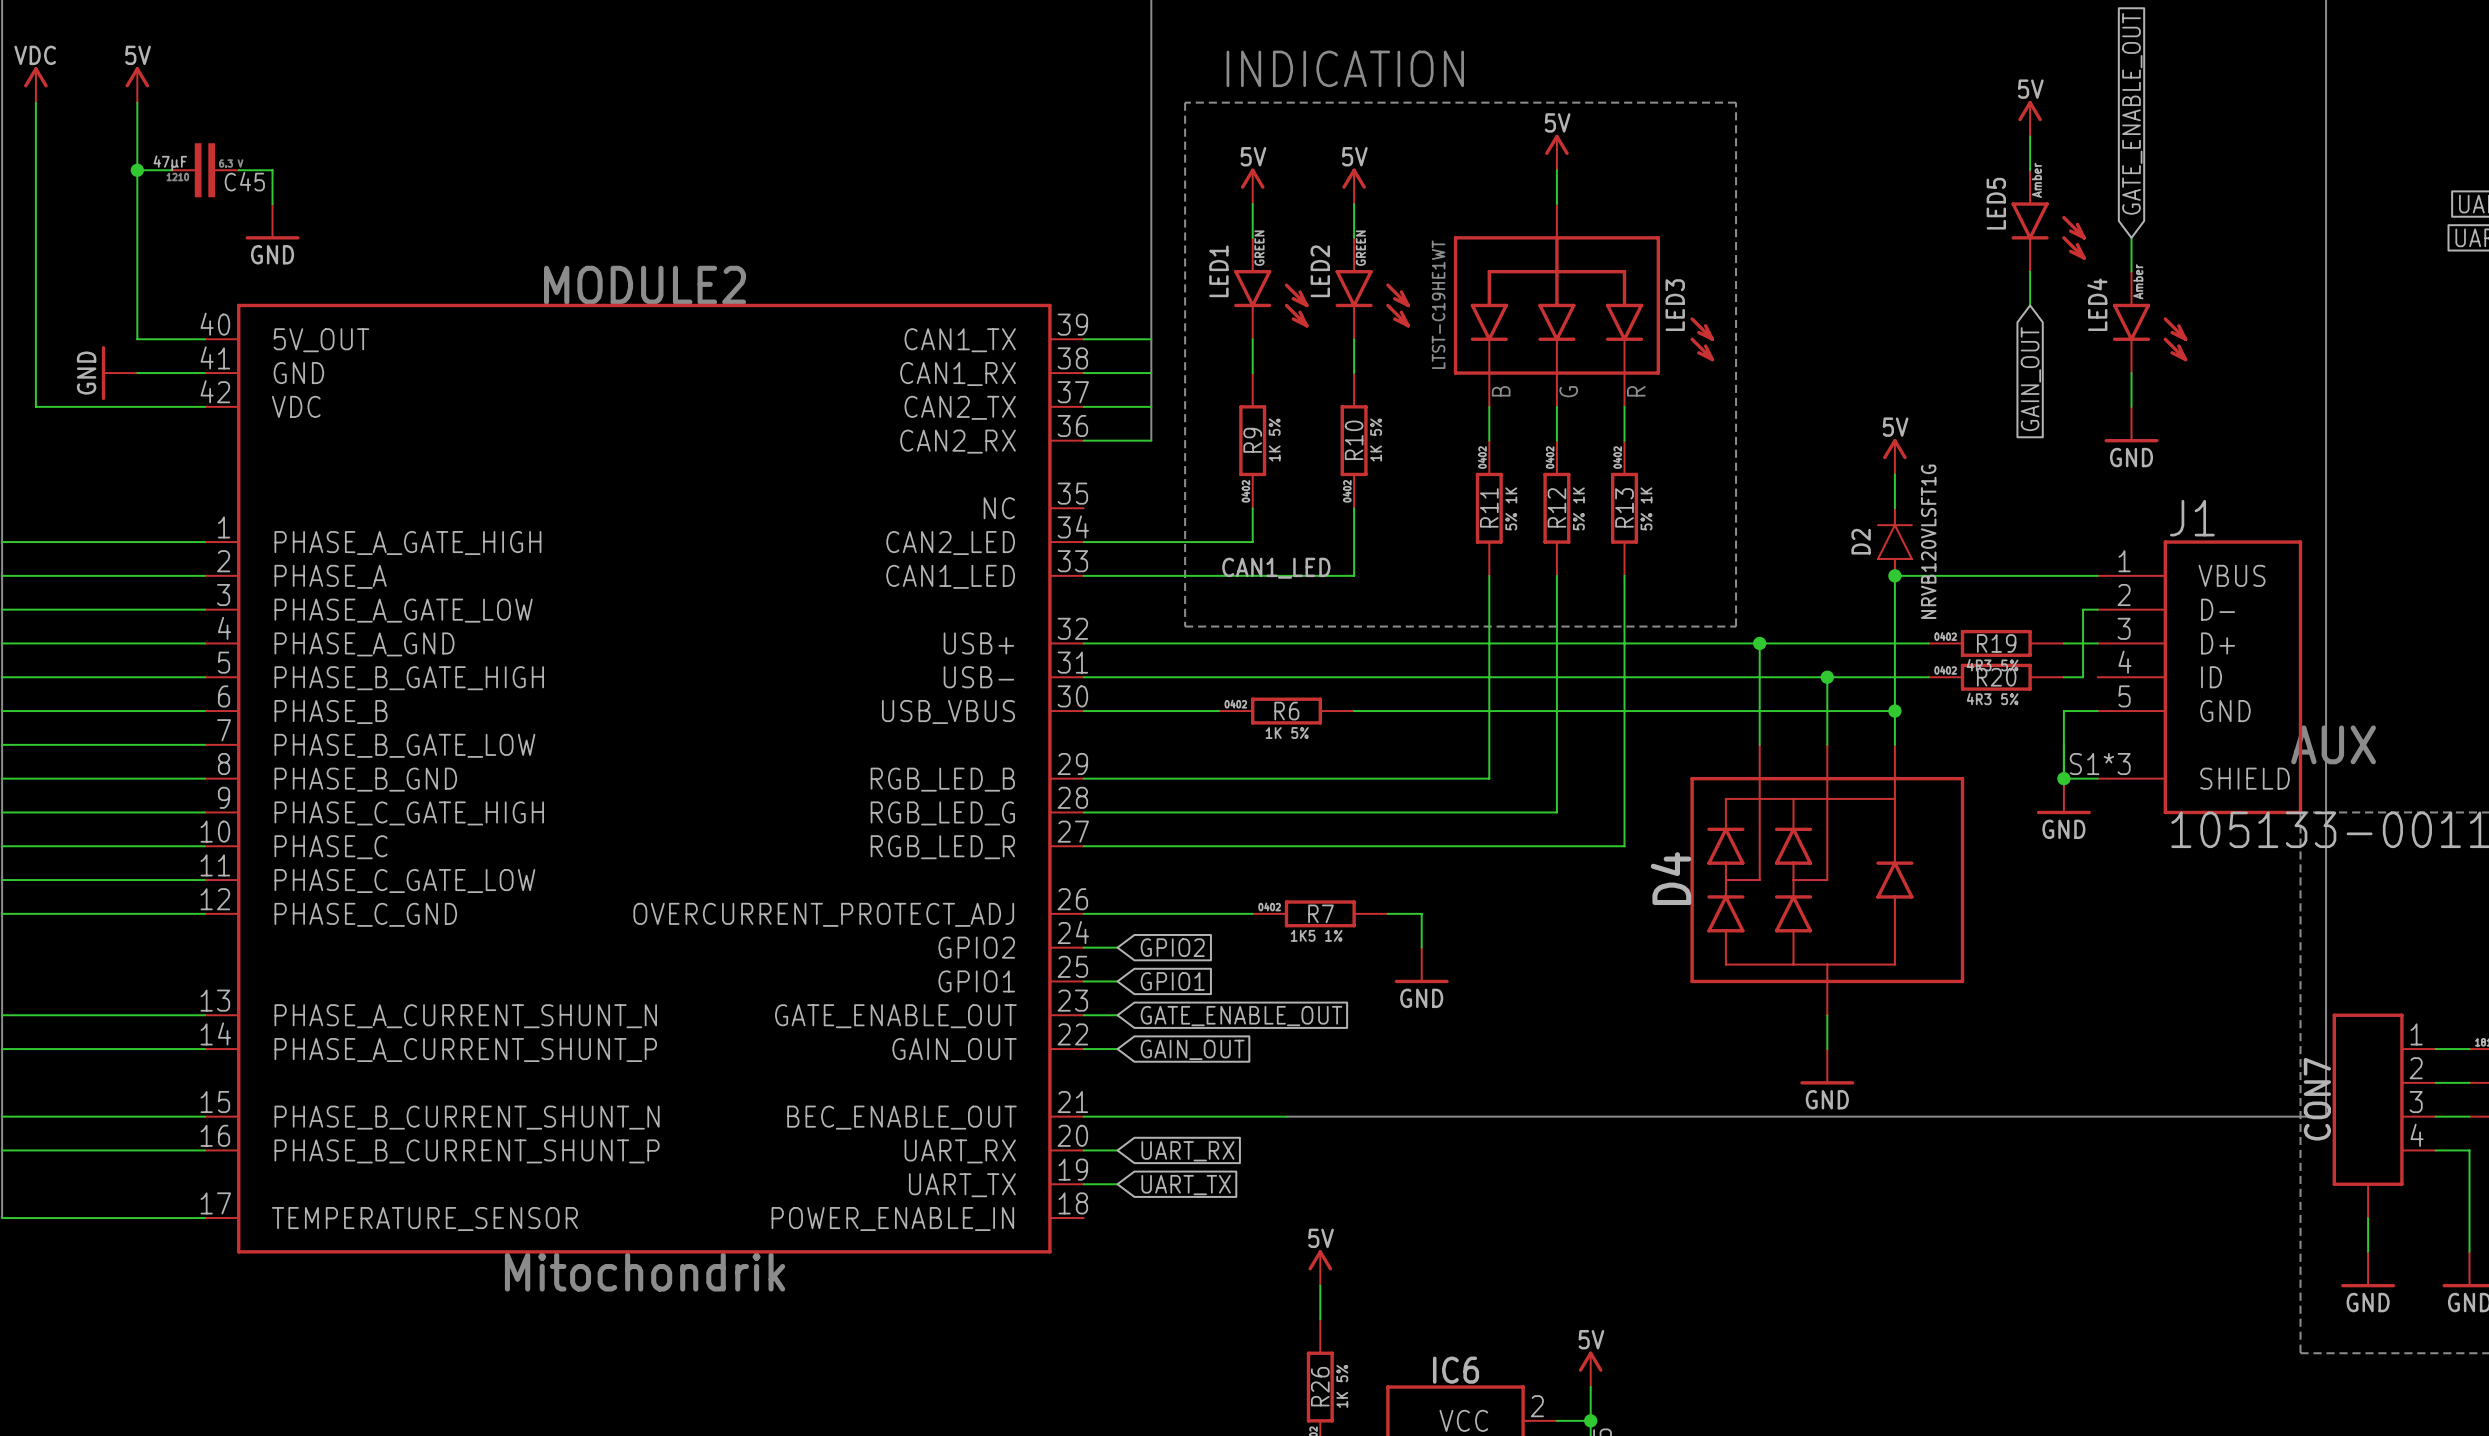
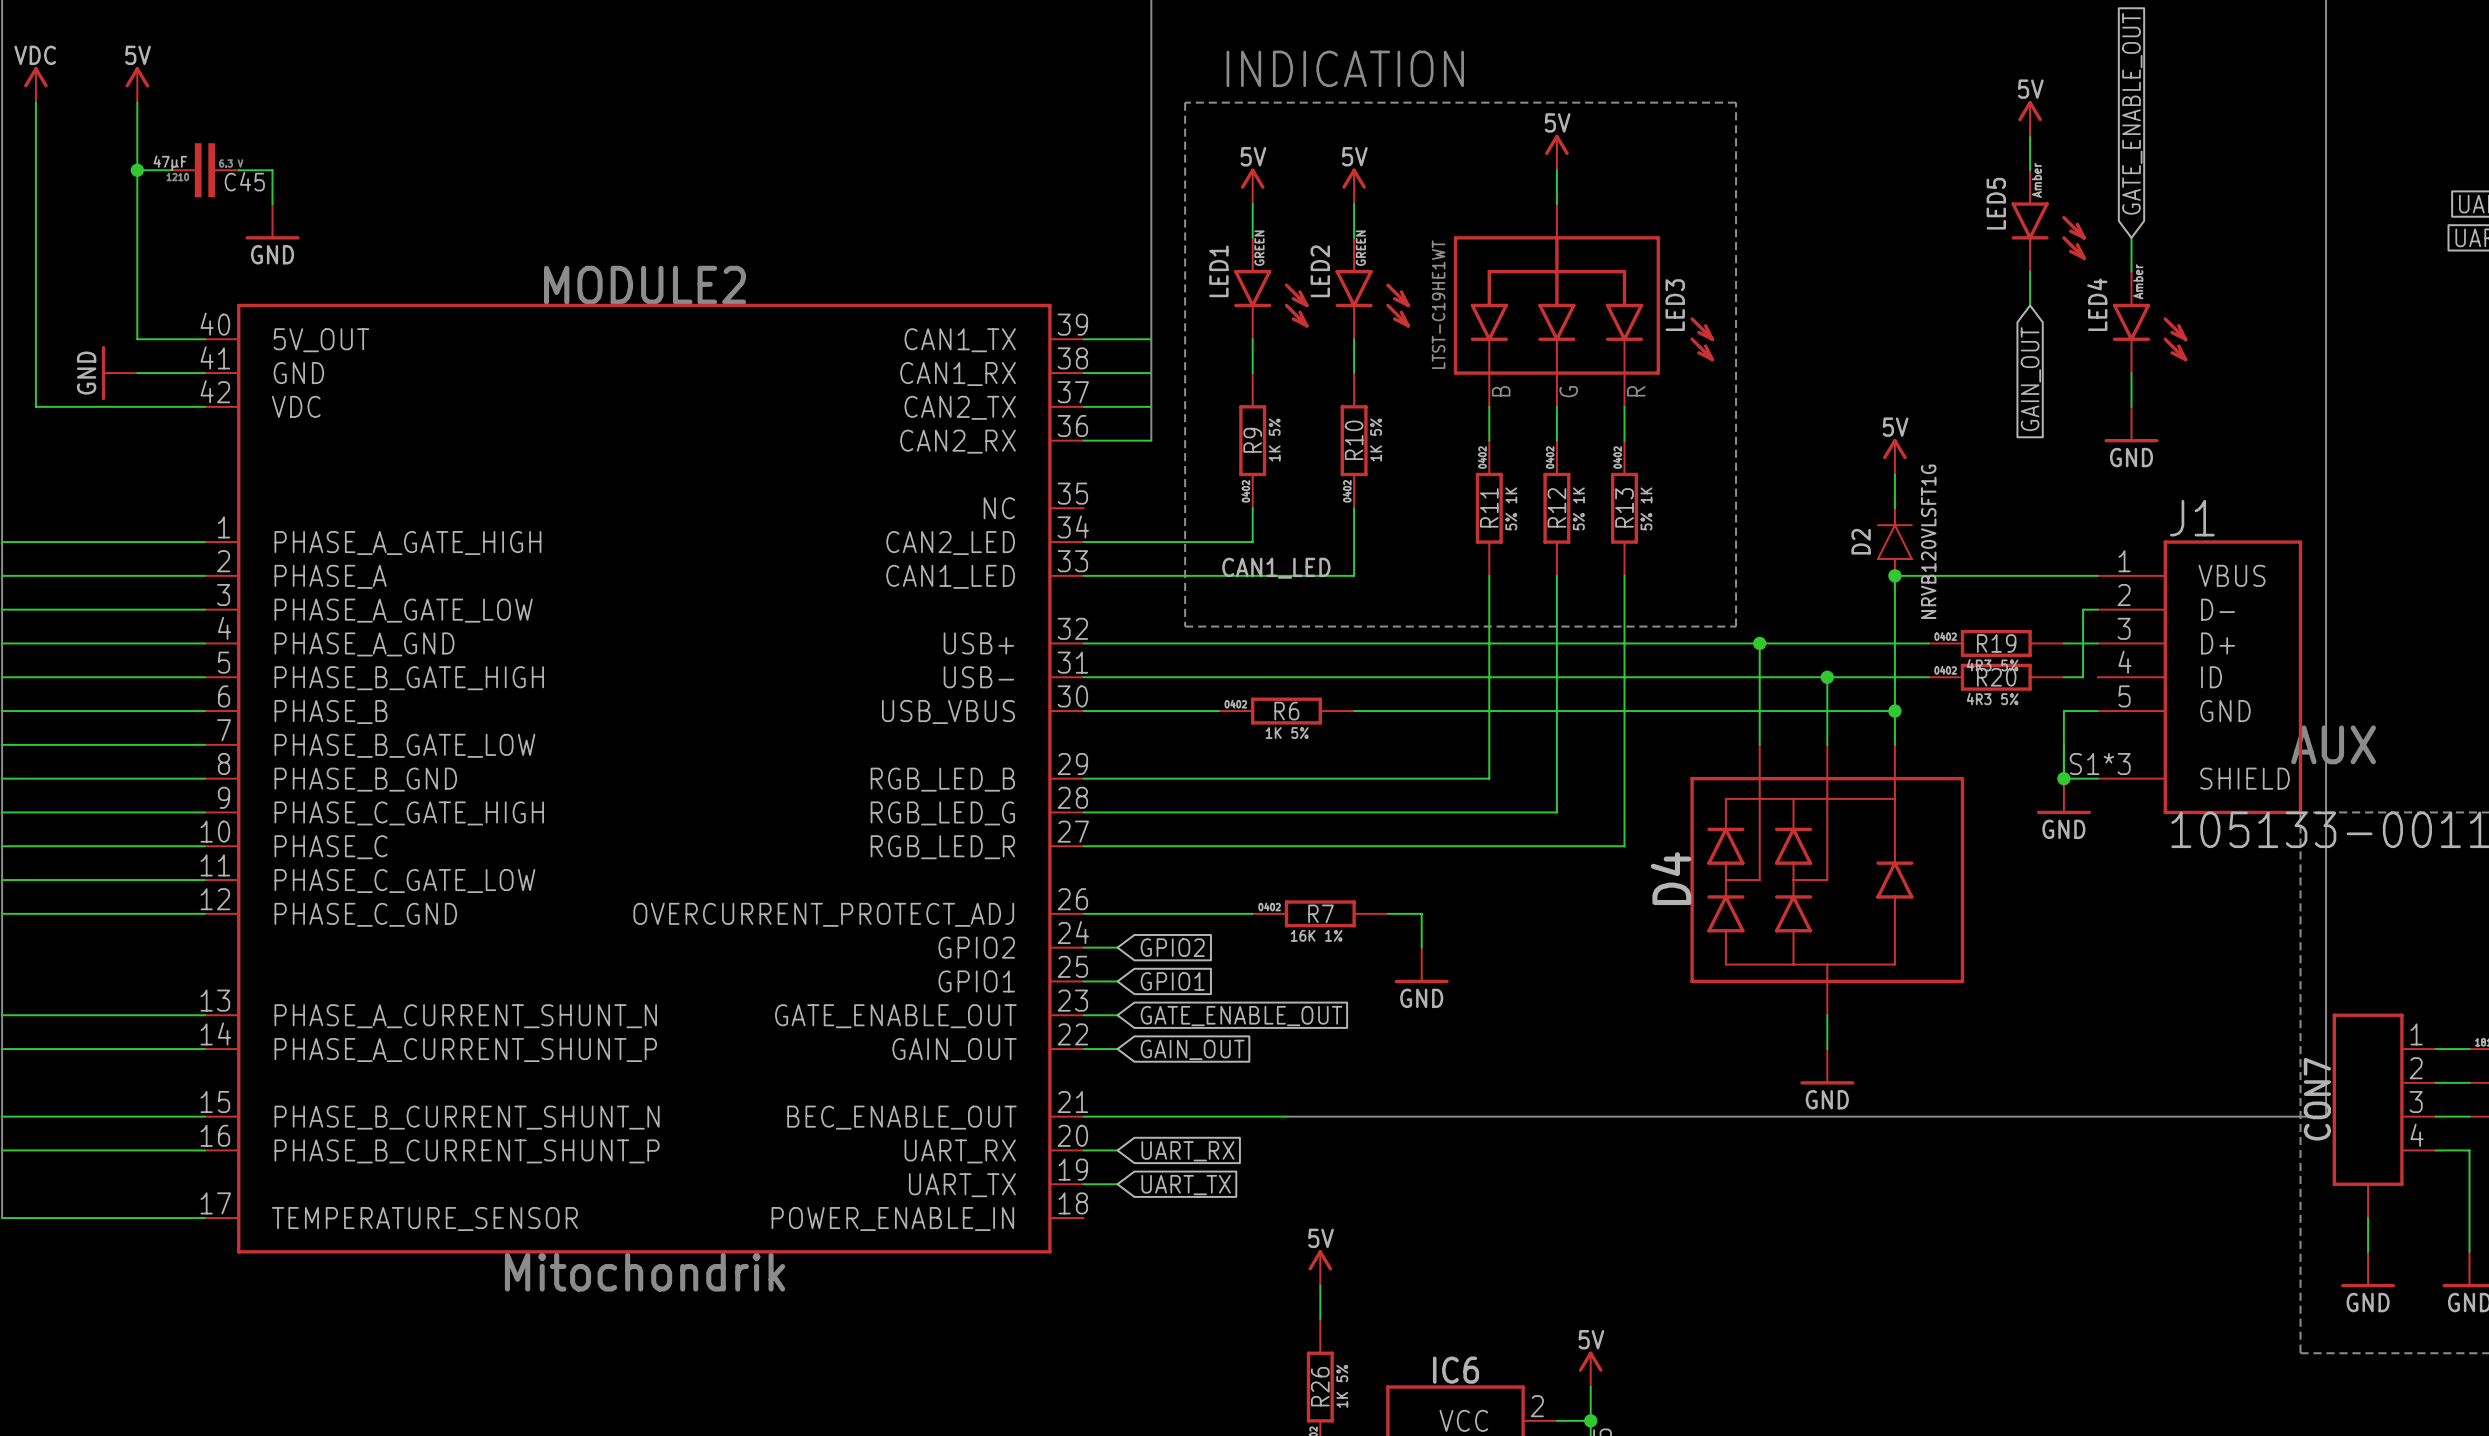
R7 value: 1K5 (1303, 935) -> 16K (1303, 935)

